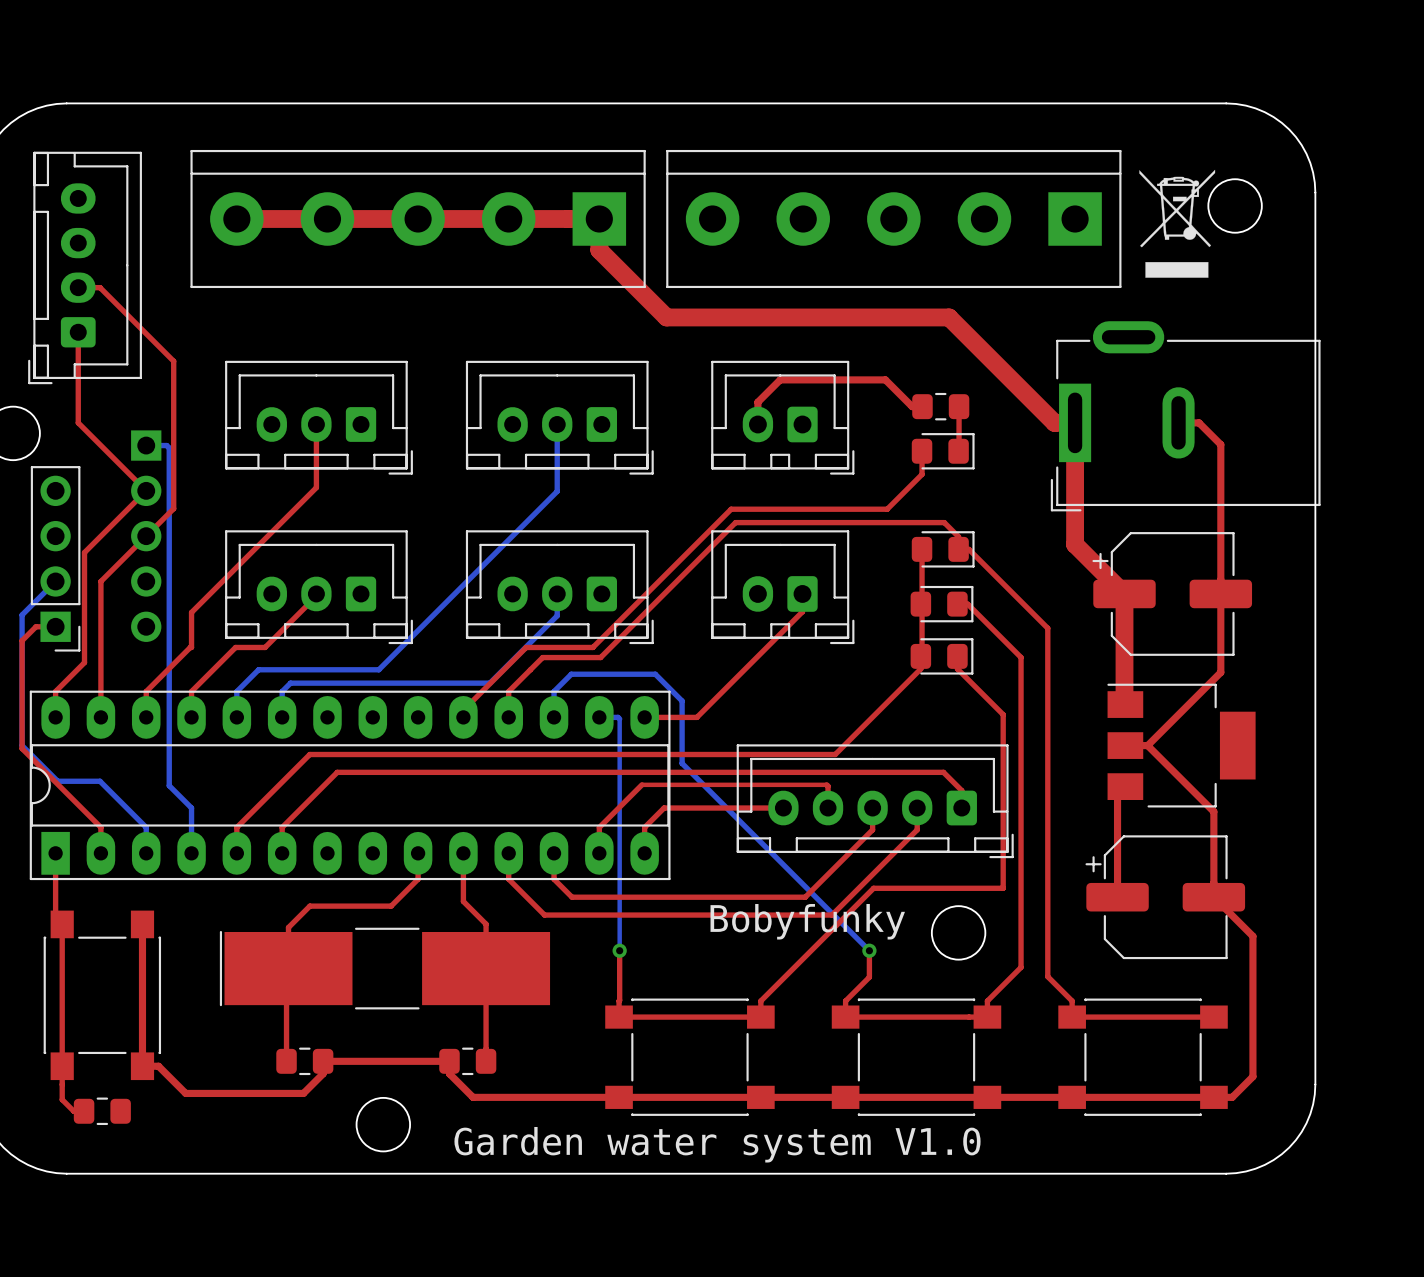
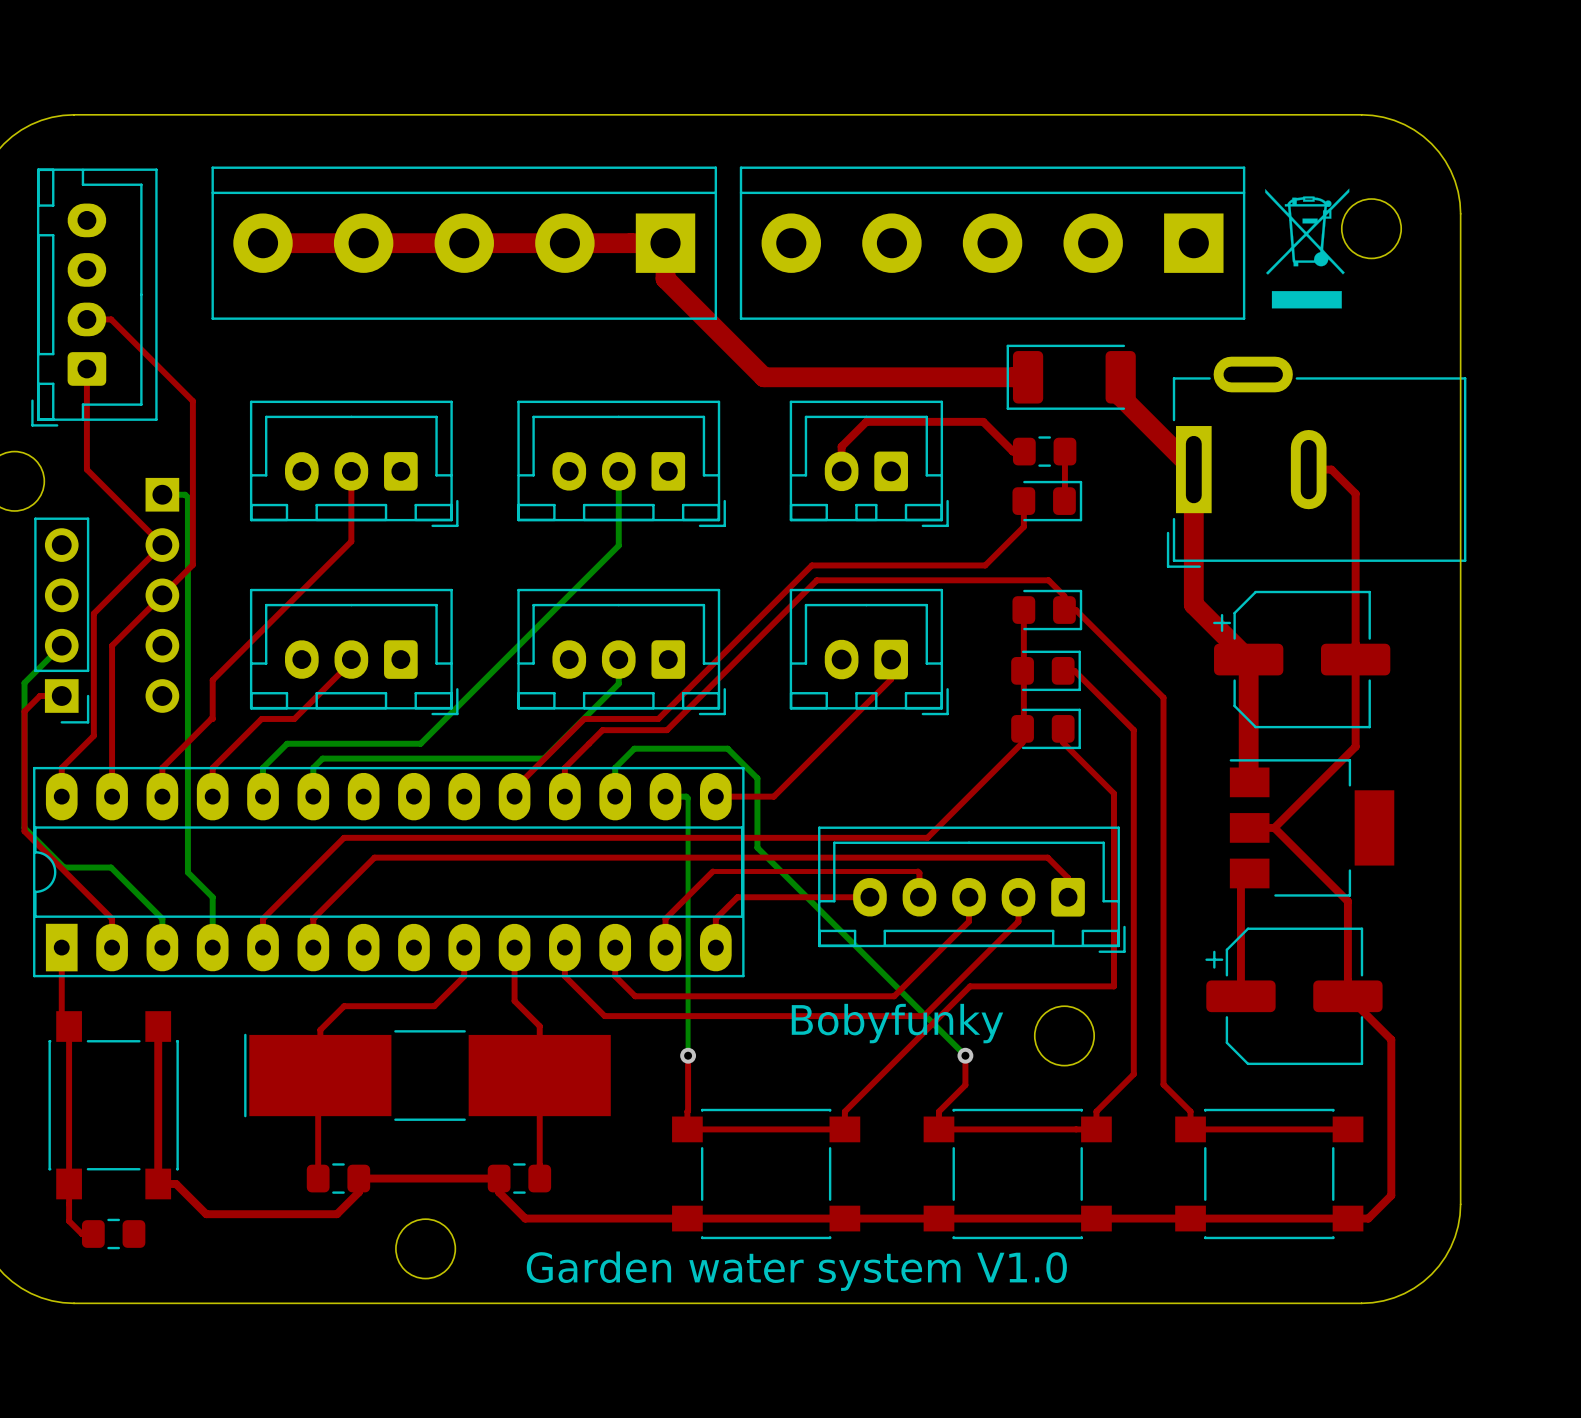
top track: (599, 250) (666, 317) (949, 317) (1054, 422) (1075, 422) -> (665, 277) (763, 377) (1028, 377)
part: none -> (1071, 377)
top track: none -> (1120, 377) (1120, 396) (1193, 469)

